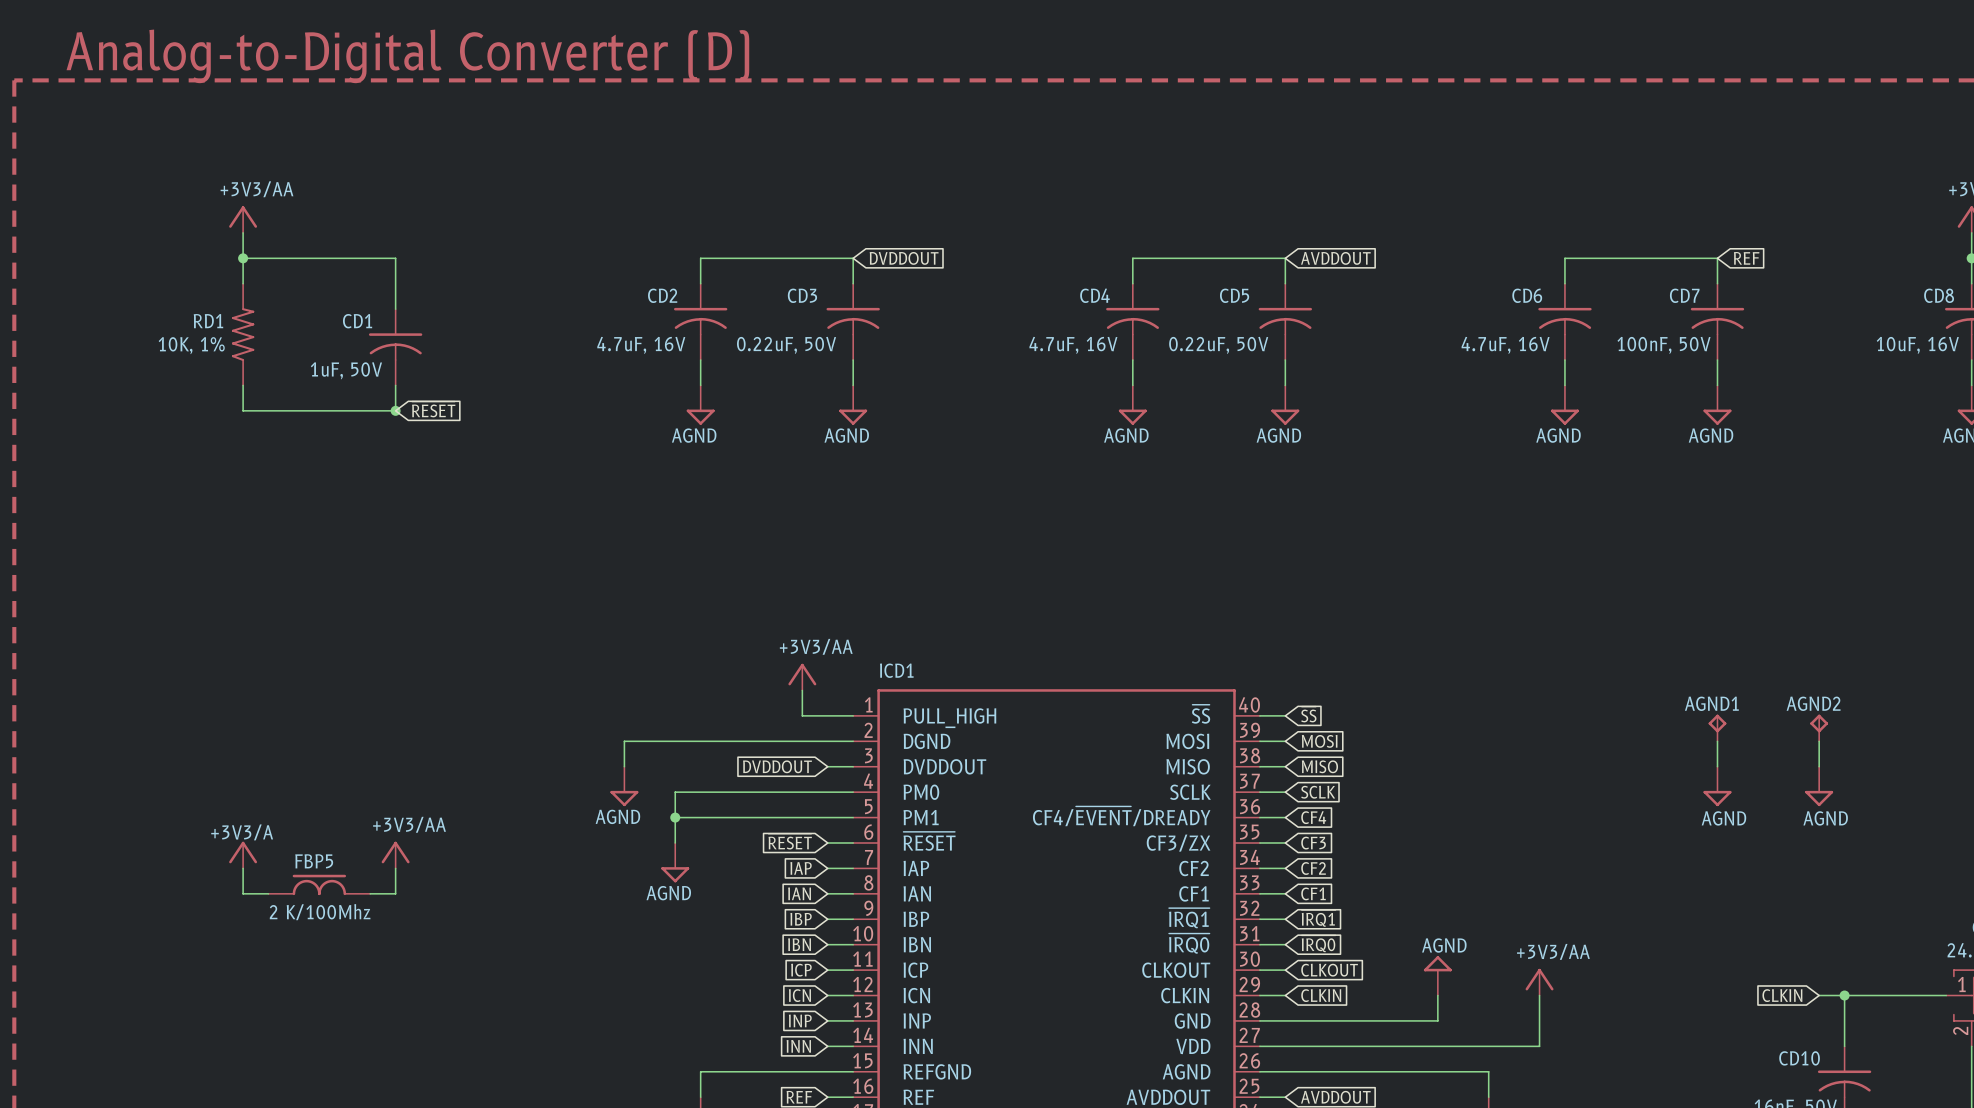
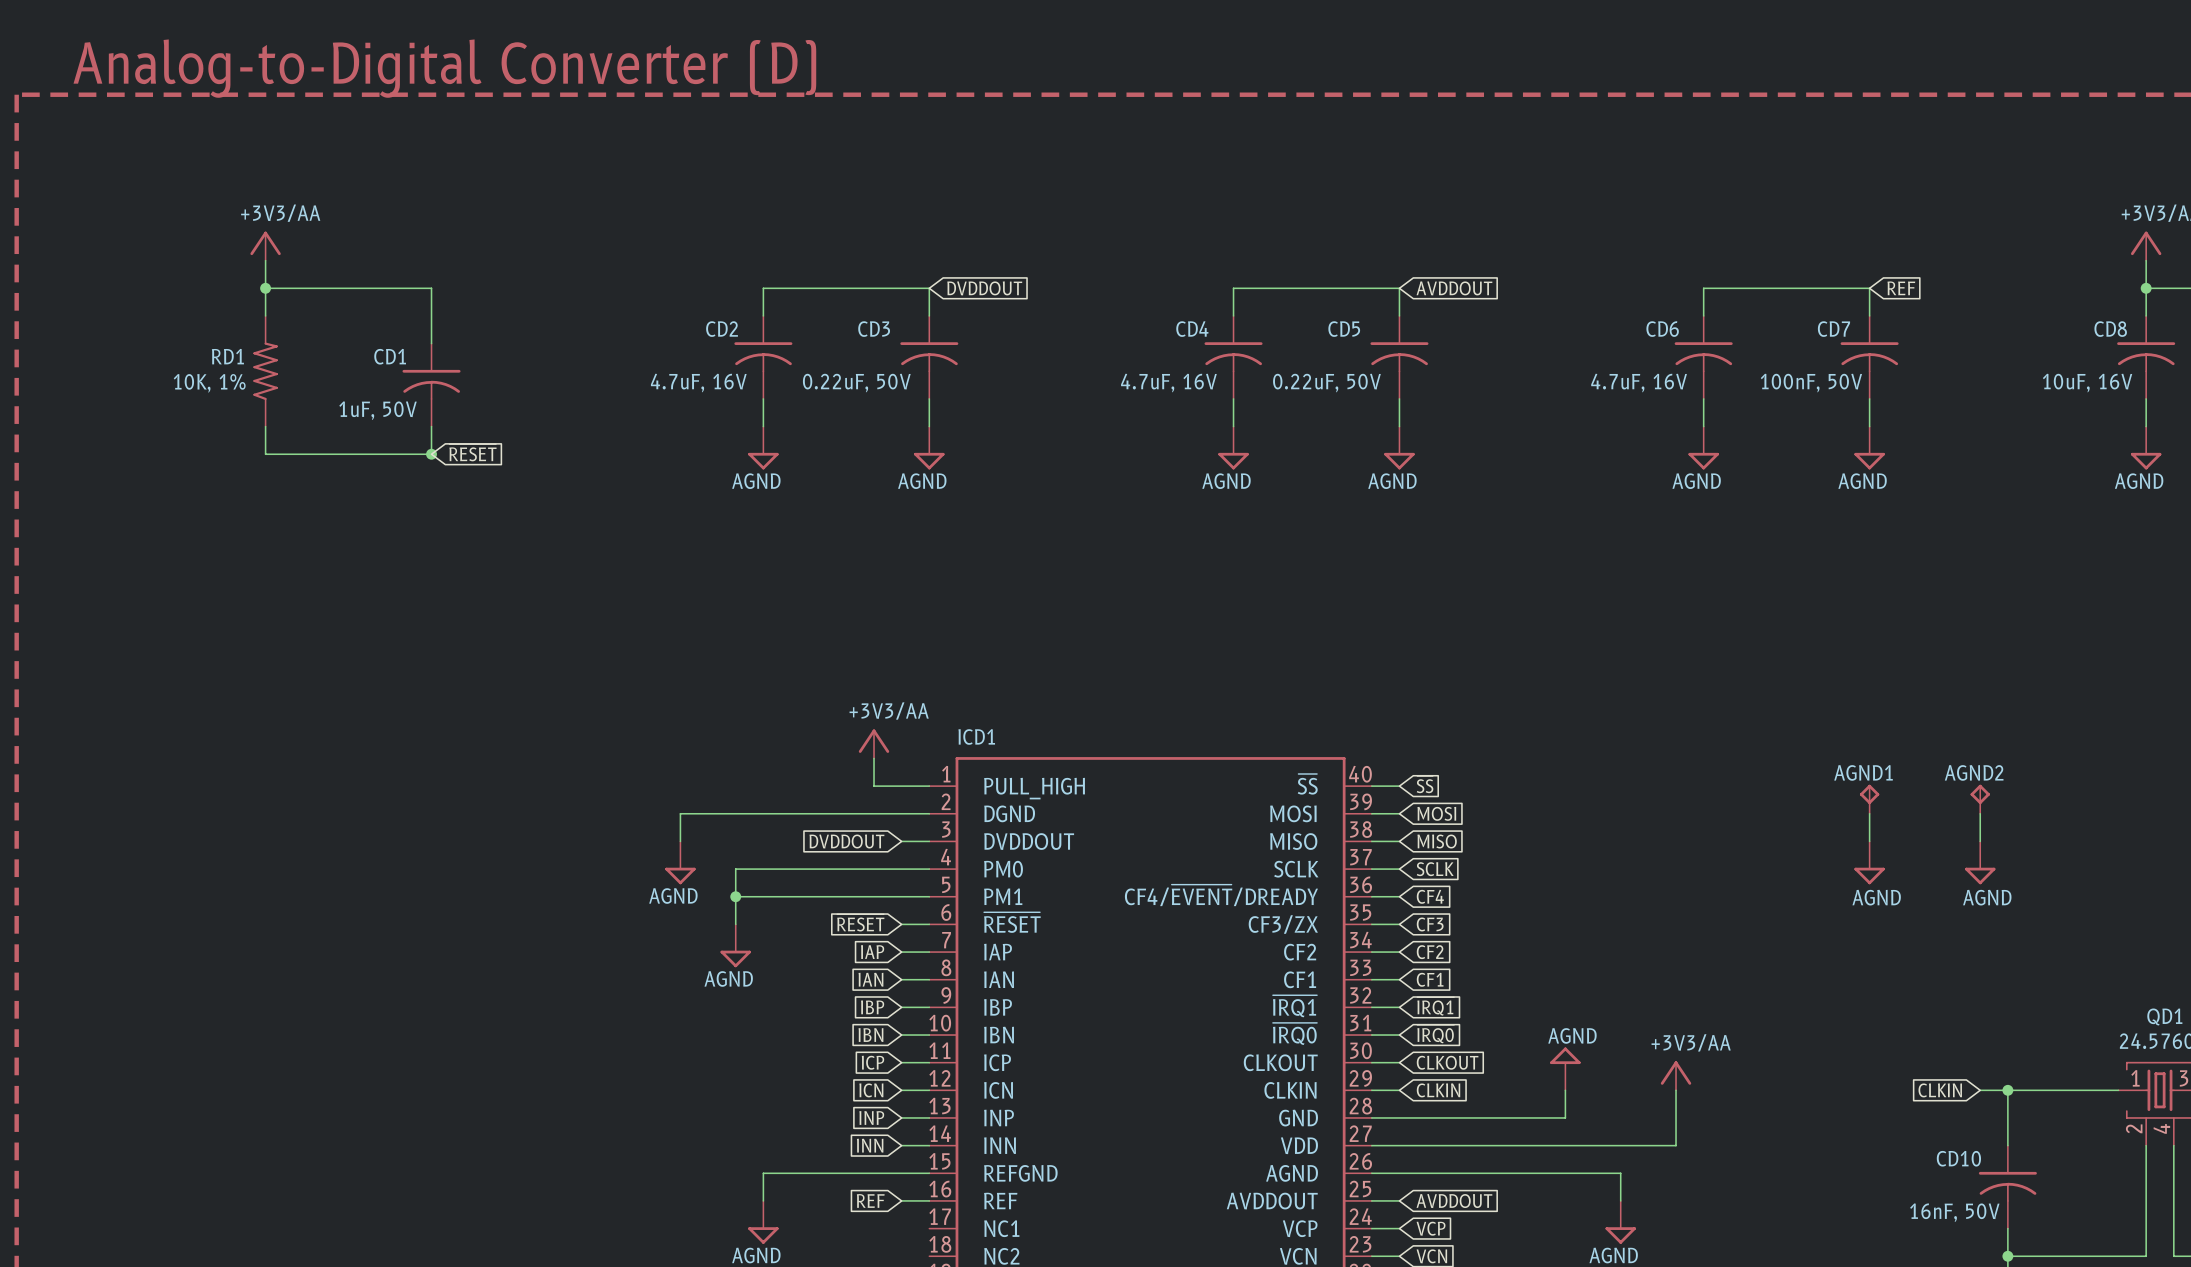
power symbol: +3V3/A (243, 855) -> none
power symbol: +3V3/AA (395, 855) -> none
wire: (243, 868) (243, 893) (268, 893) -> none
wire: (395, 868) (395, 893) (370, 893) -> none
FBP5: 2 K/100Mhz (319, 884) -> none

